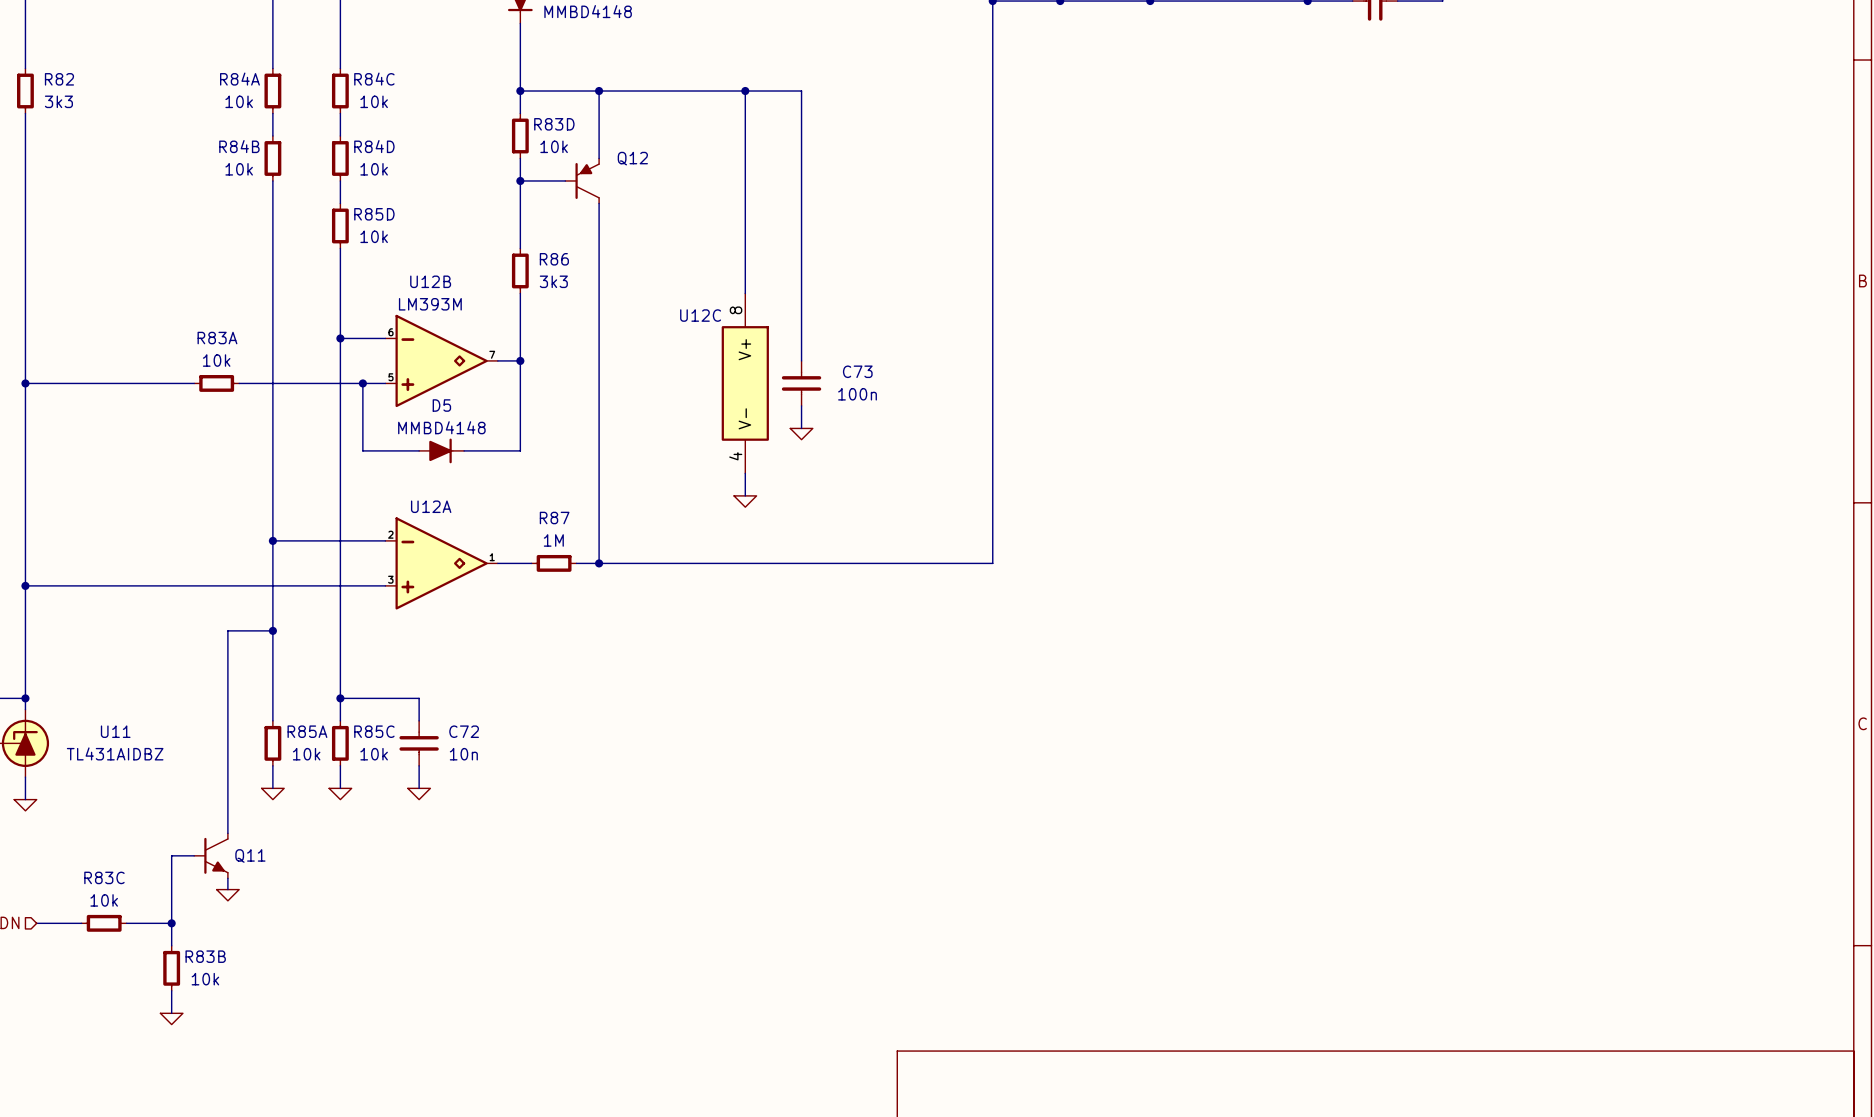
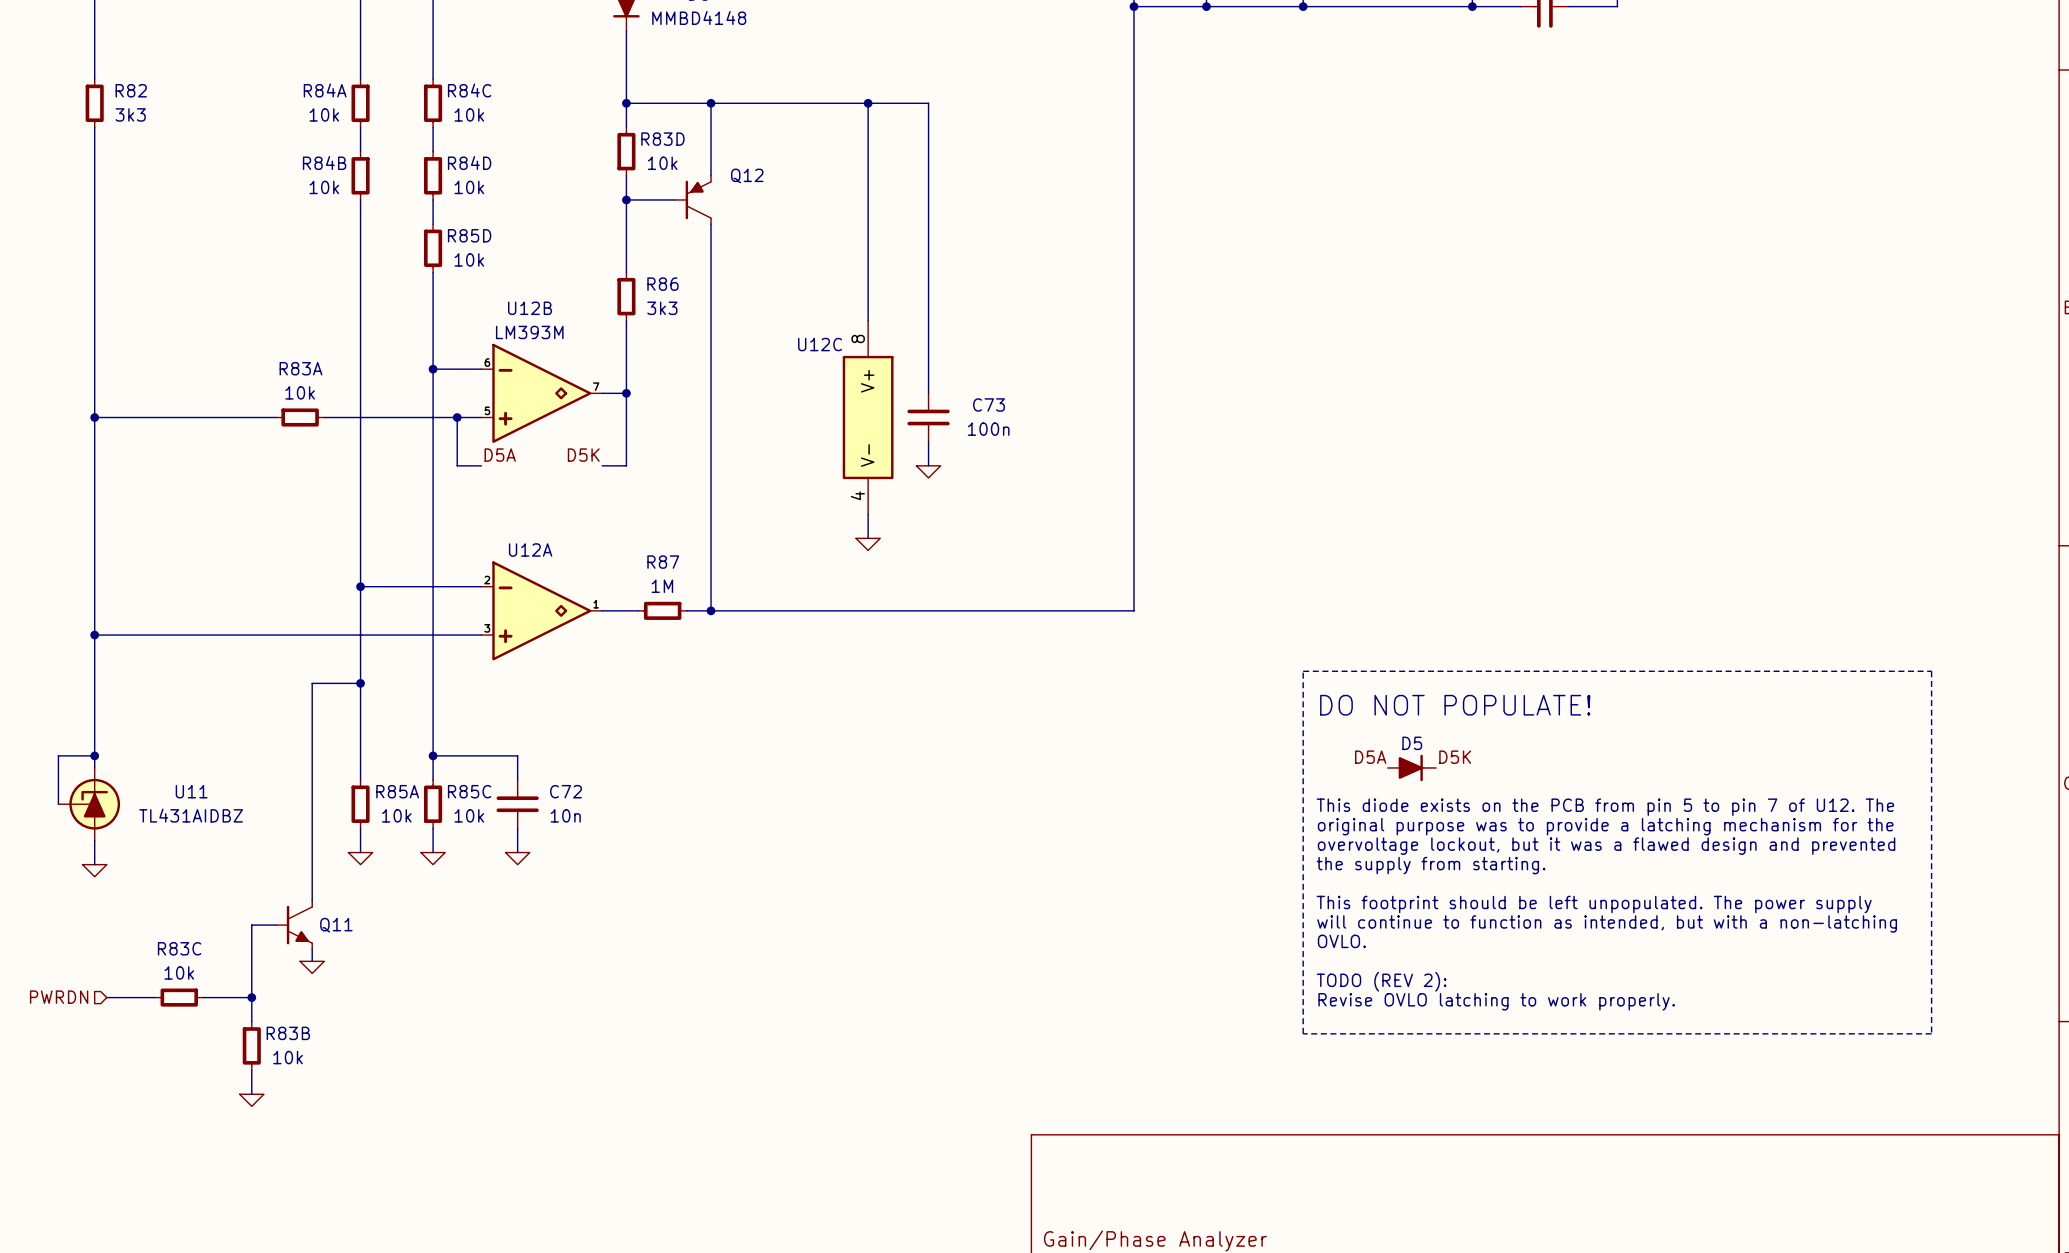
D5 name position: D5 (441, 405) -> D5 (1412, 743)
label: none -> D5A (500, 455)
label: none -> D5K (583, 455)
D5 value: MMBD4148 (441, 427) -> none
wire: (362, 428) (362, 450) (419, 450) -> (457, 465) (481, 465)
wire: (520, 428) (520, 450) (464, 450) -> (626, 465) (602, 465)
D5 position: (441, 450) -> (1411, 767)
line: none -> (1303, 671) (1931, 671) (1931, 1033) (1303, 1033) (1303, 671)
text: none -> DO NOT POPULATE! (1455, 705)
label: none -> D5A (1370, 757)
label: none -> D5K (1455, 757)
text: none -> This diode exists on the PCB from pin 5 to pin 7 of U12. The (1605, 807)
text: none -> original purpose was to provide a latching mechanism for the (1605, 826)
text: none -> overvoltage lockout, but it was a flawed design and prevented (1606, 846)
text: none -> the supply from starting. (1431, 865)
text: none -> This footprint should be left unpopulated. The power supply (1594, 904)
text: none -> will continue to function as intended, but with a non-latching (1607, 923)
text: none -> OVLO. (1341, 941)
text: none -> TODO (REV 2): (1381, 981)
text: none -> Revise OVLO latching to work properly. (1496, 1001)

